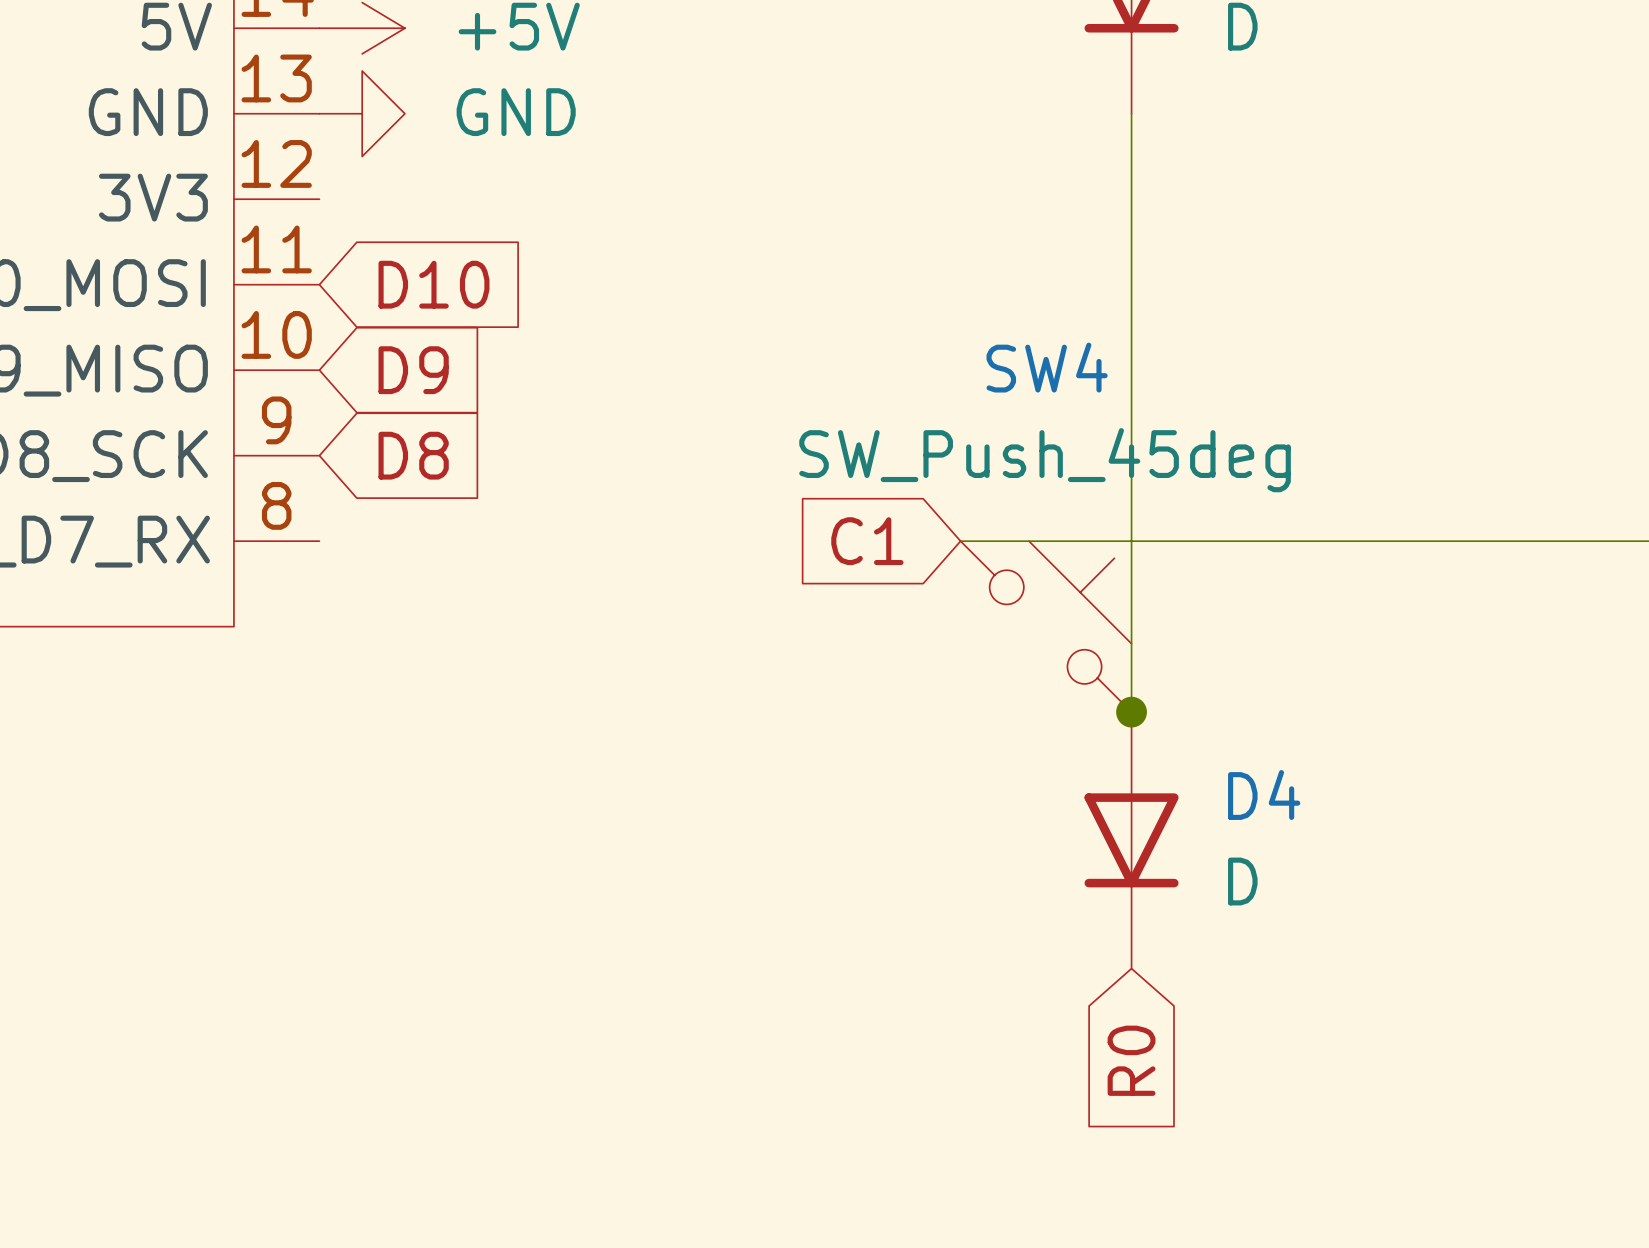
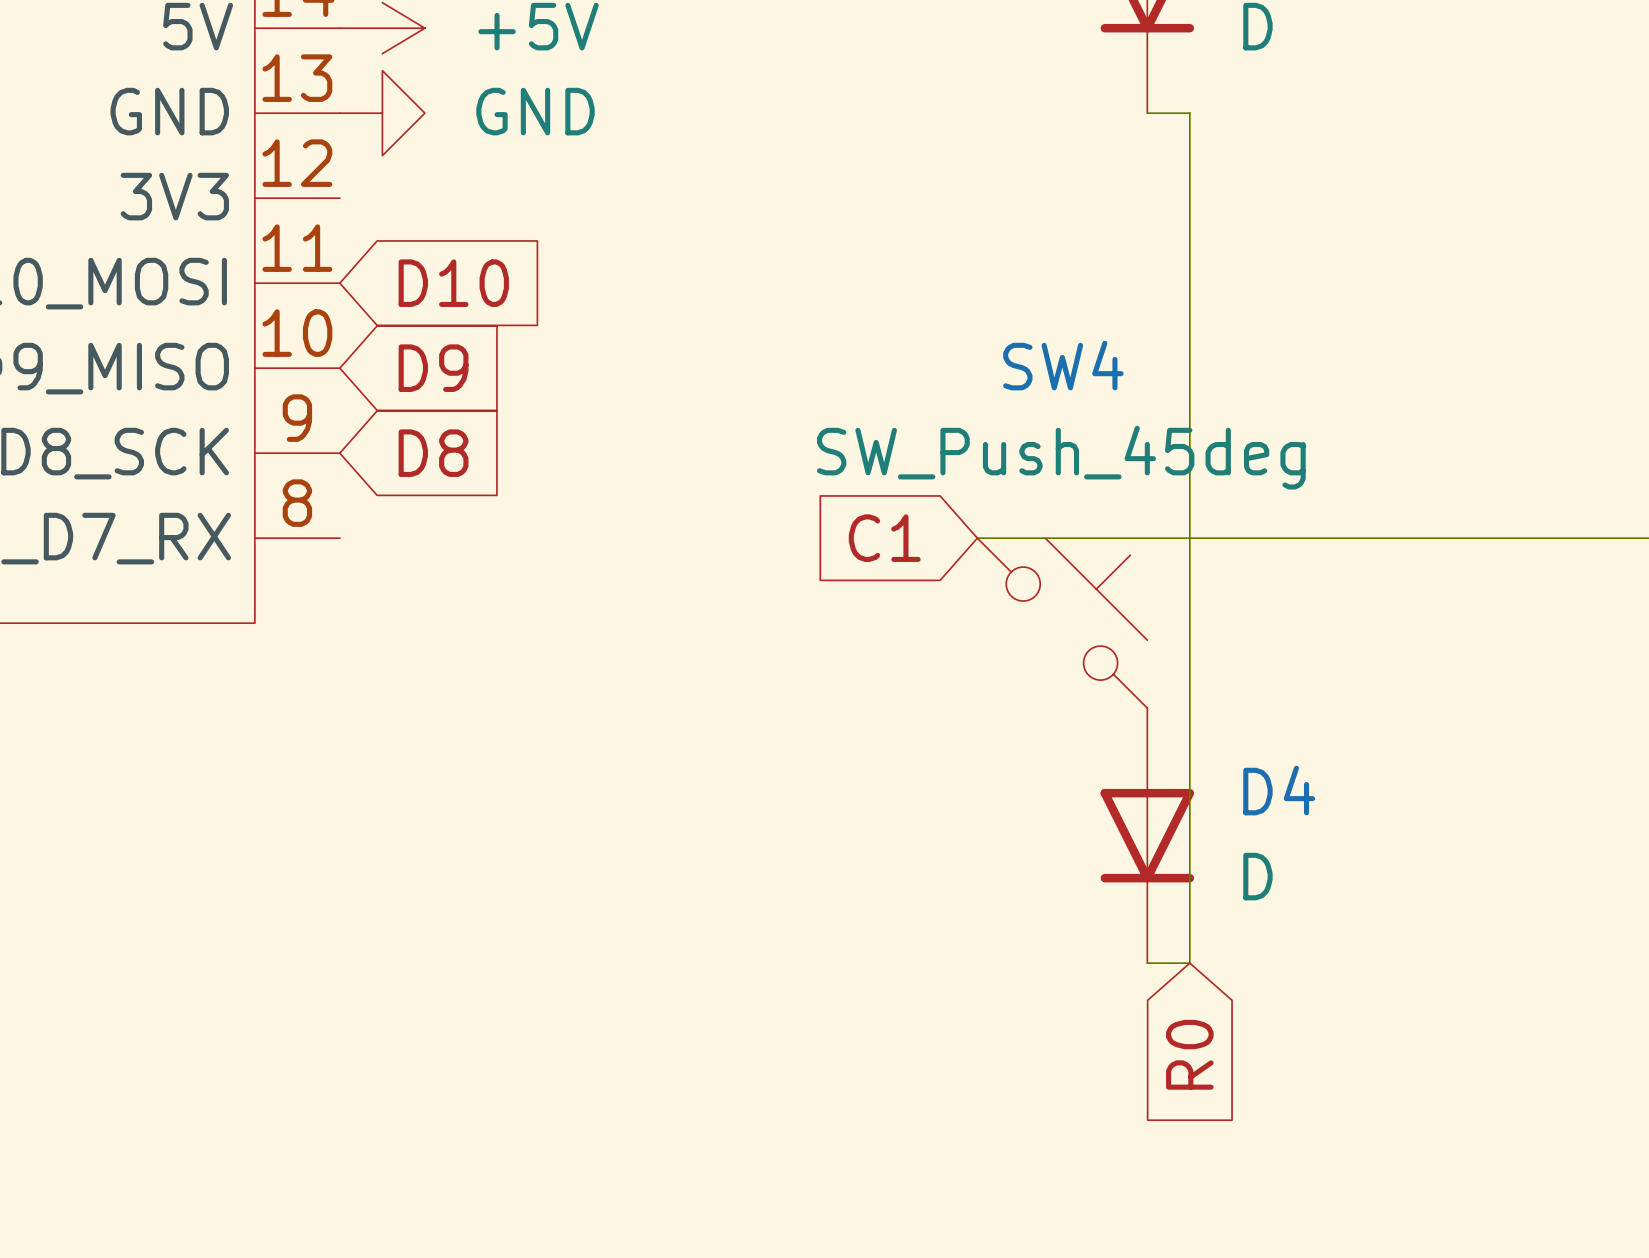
wire: (1131, 113) (1131, 712) -> (1147, 113) (1189, 113) (1189, 963) (1147, 963)
junction: (1131, 712) -> none
global label position: R0 (1131, 1060) -> R0 (1189, 1054)

